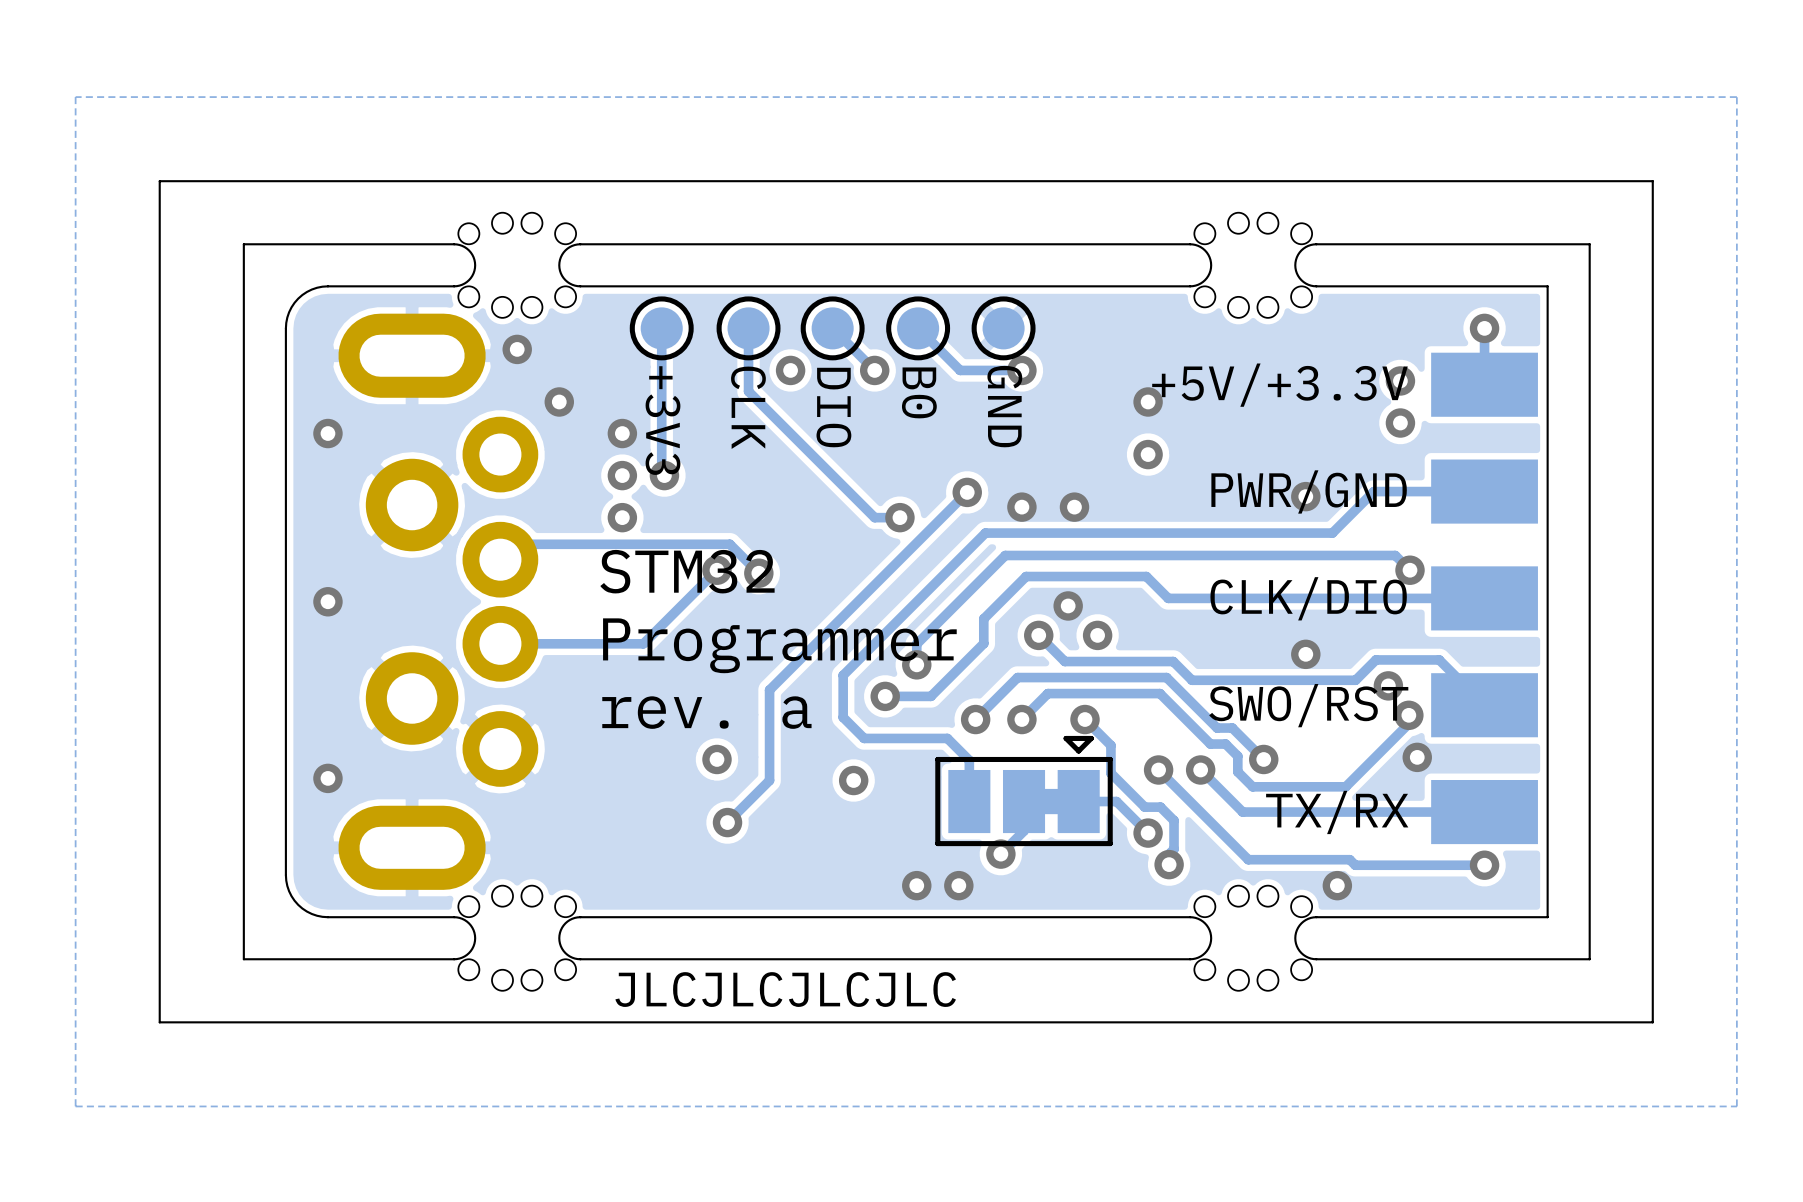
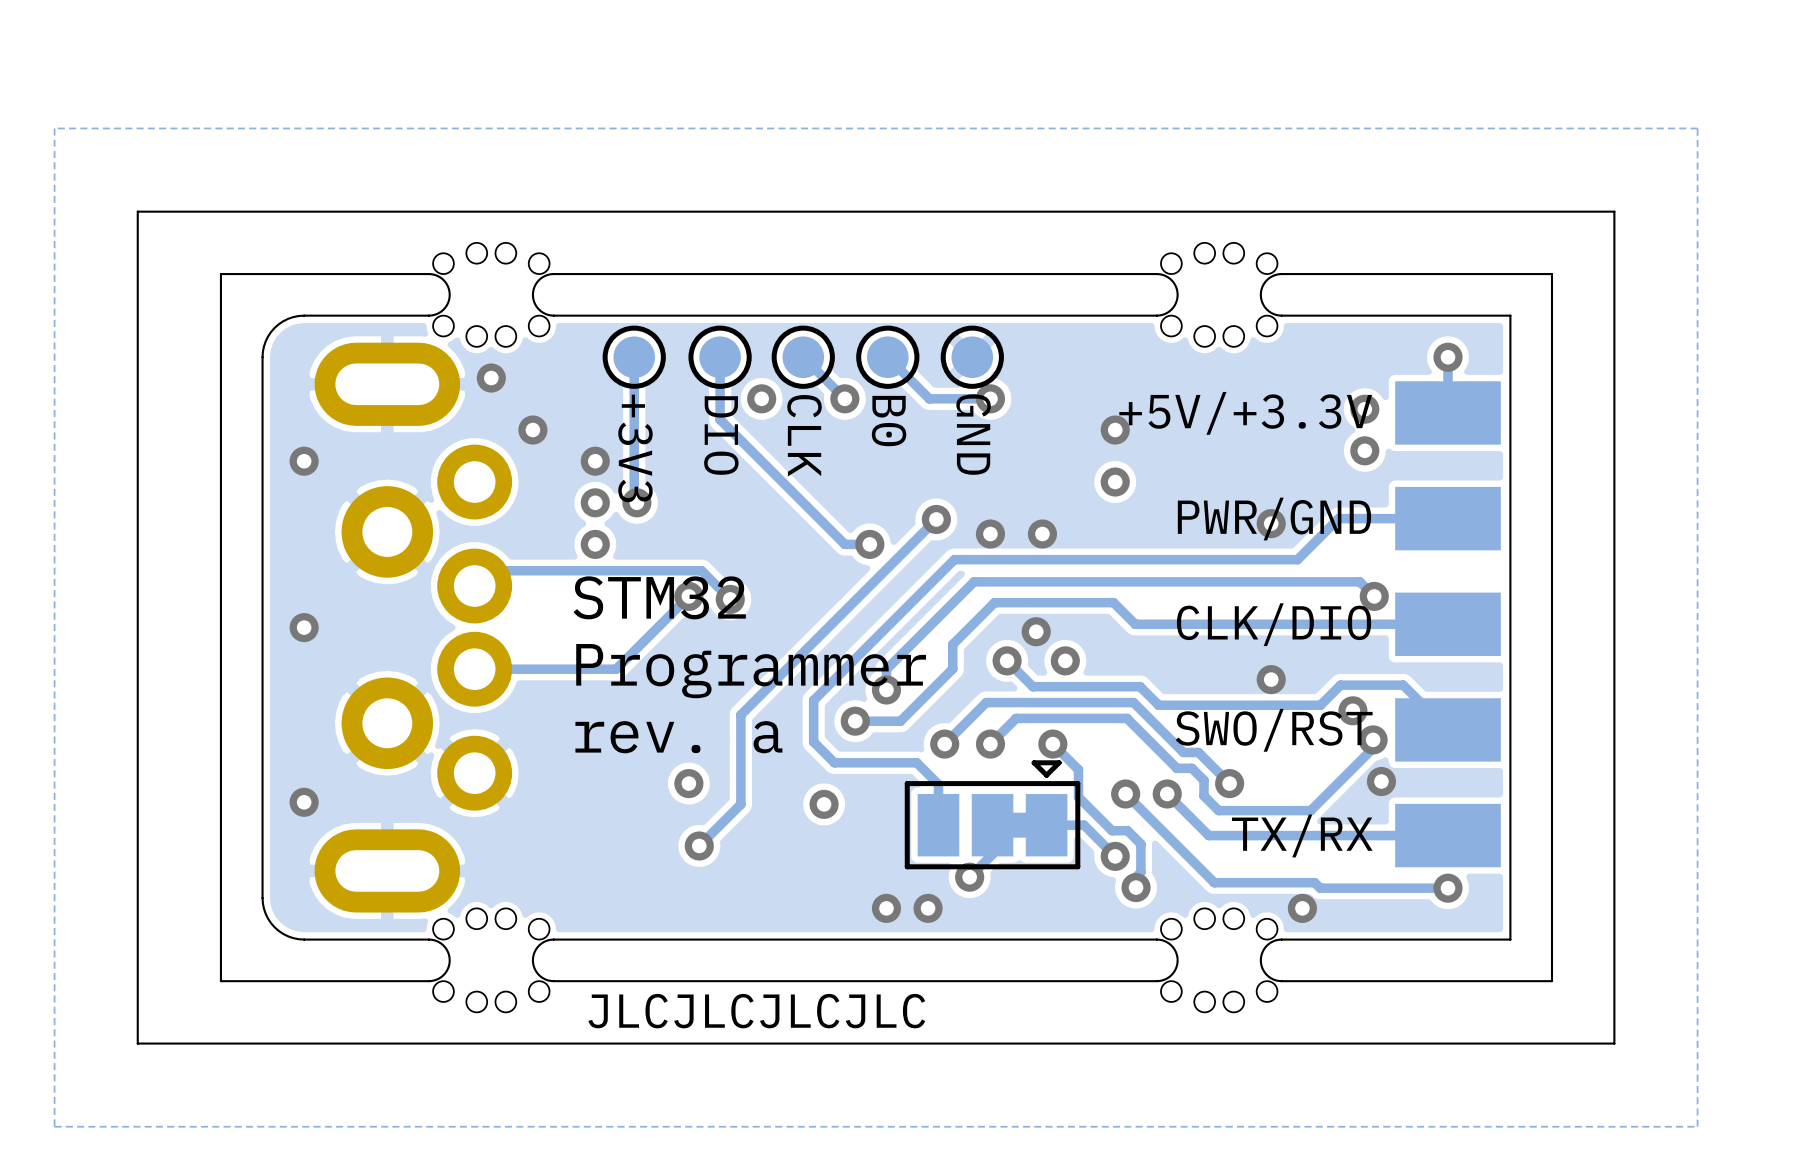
text: CLK (748, 407) -> DIO (721, 435)
text: DIO (833, 407) -> CLK (804, 435)

